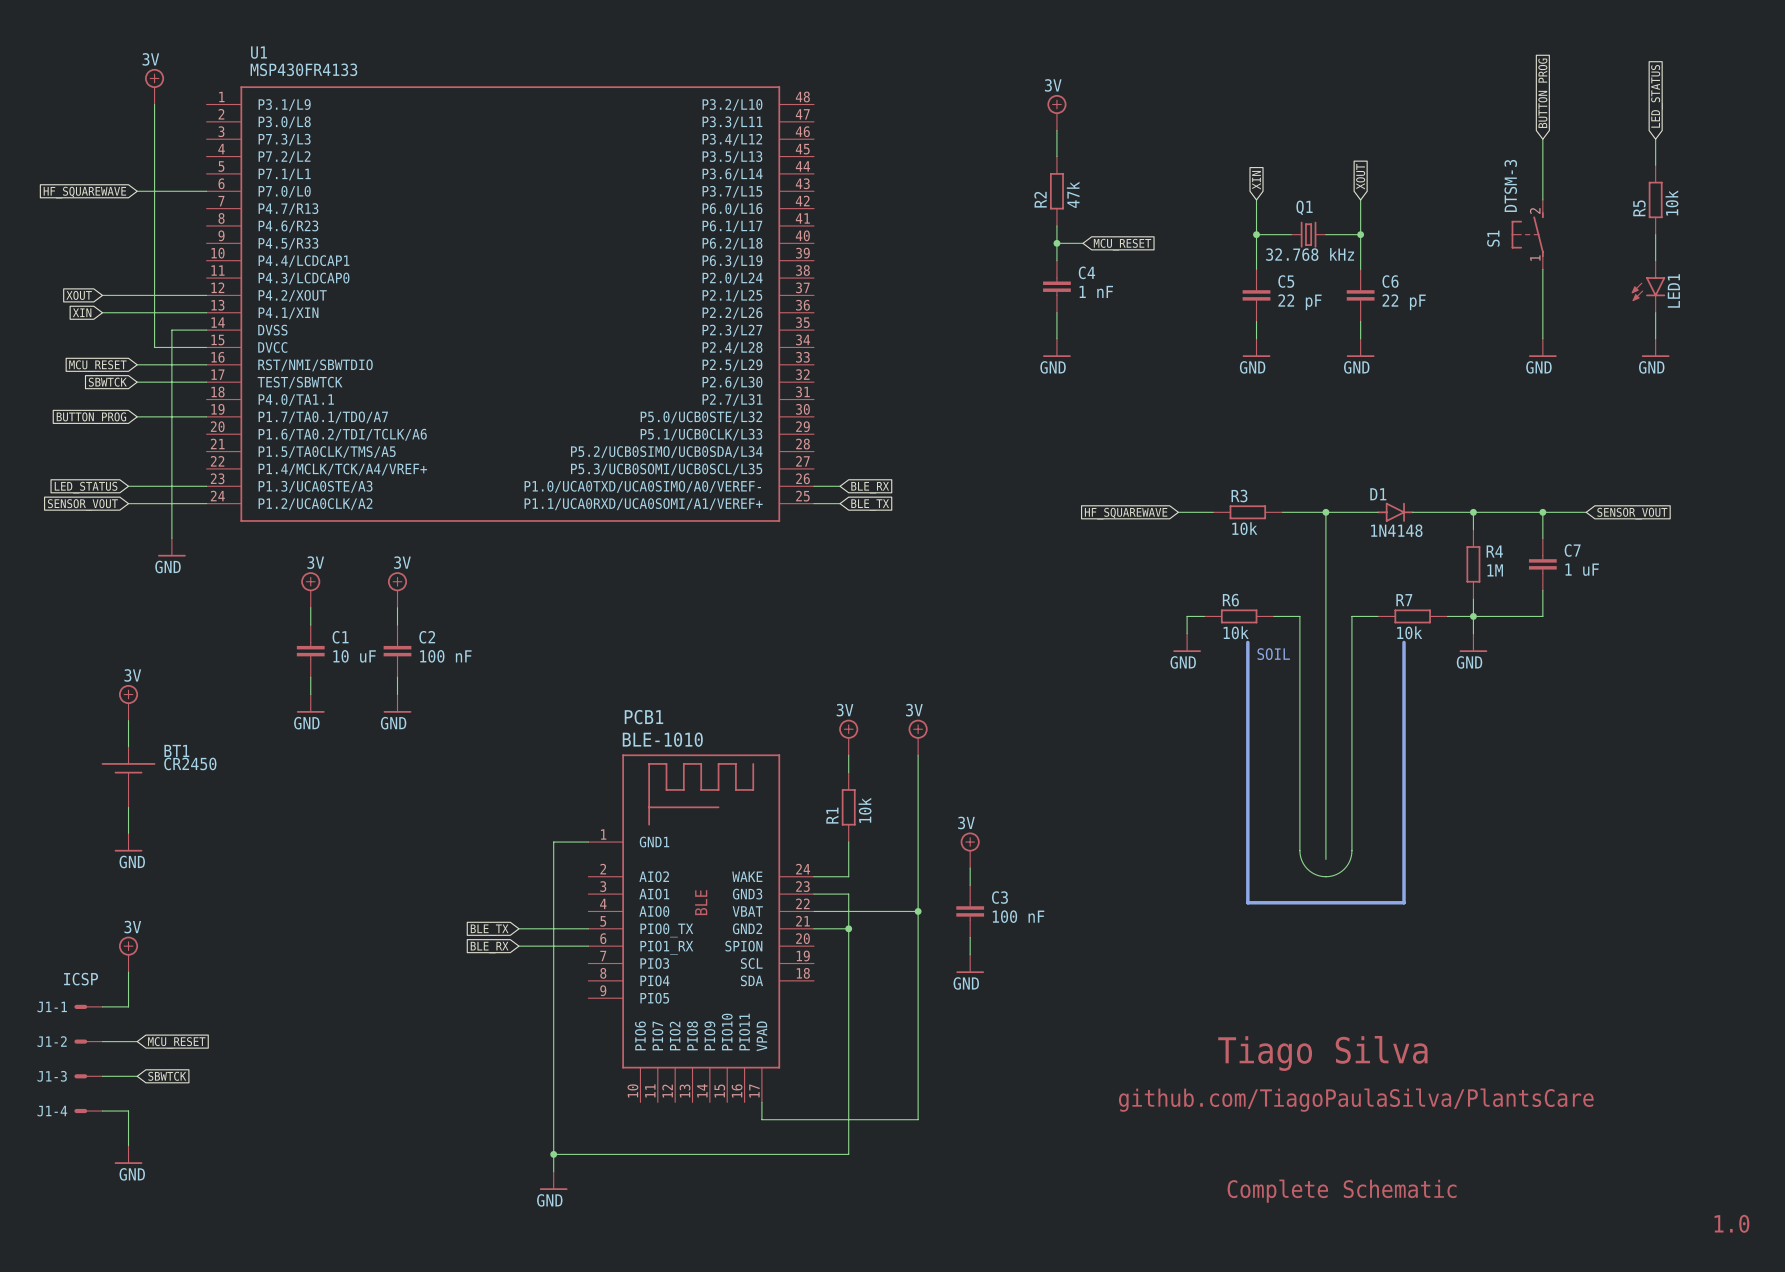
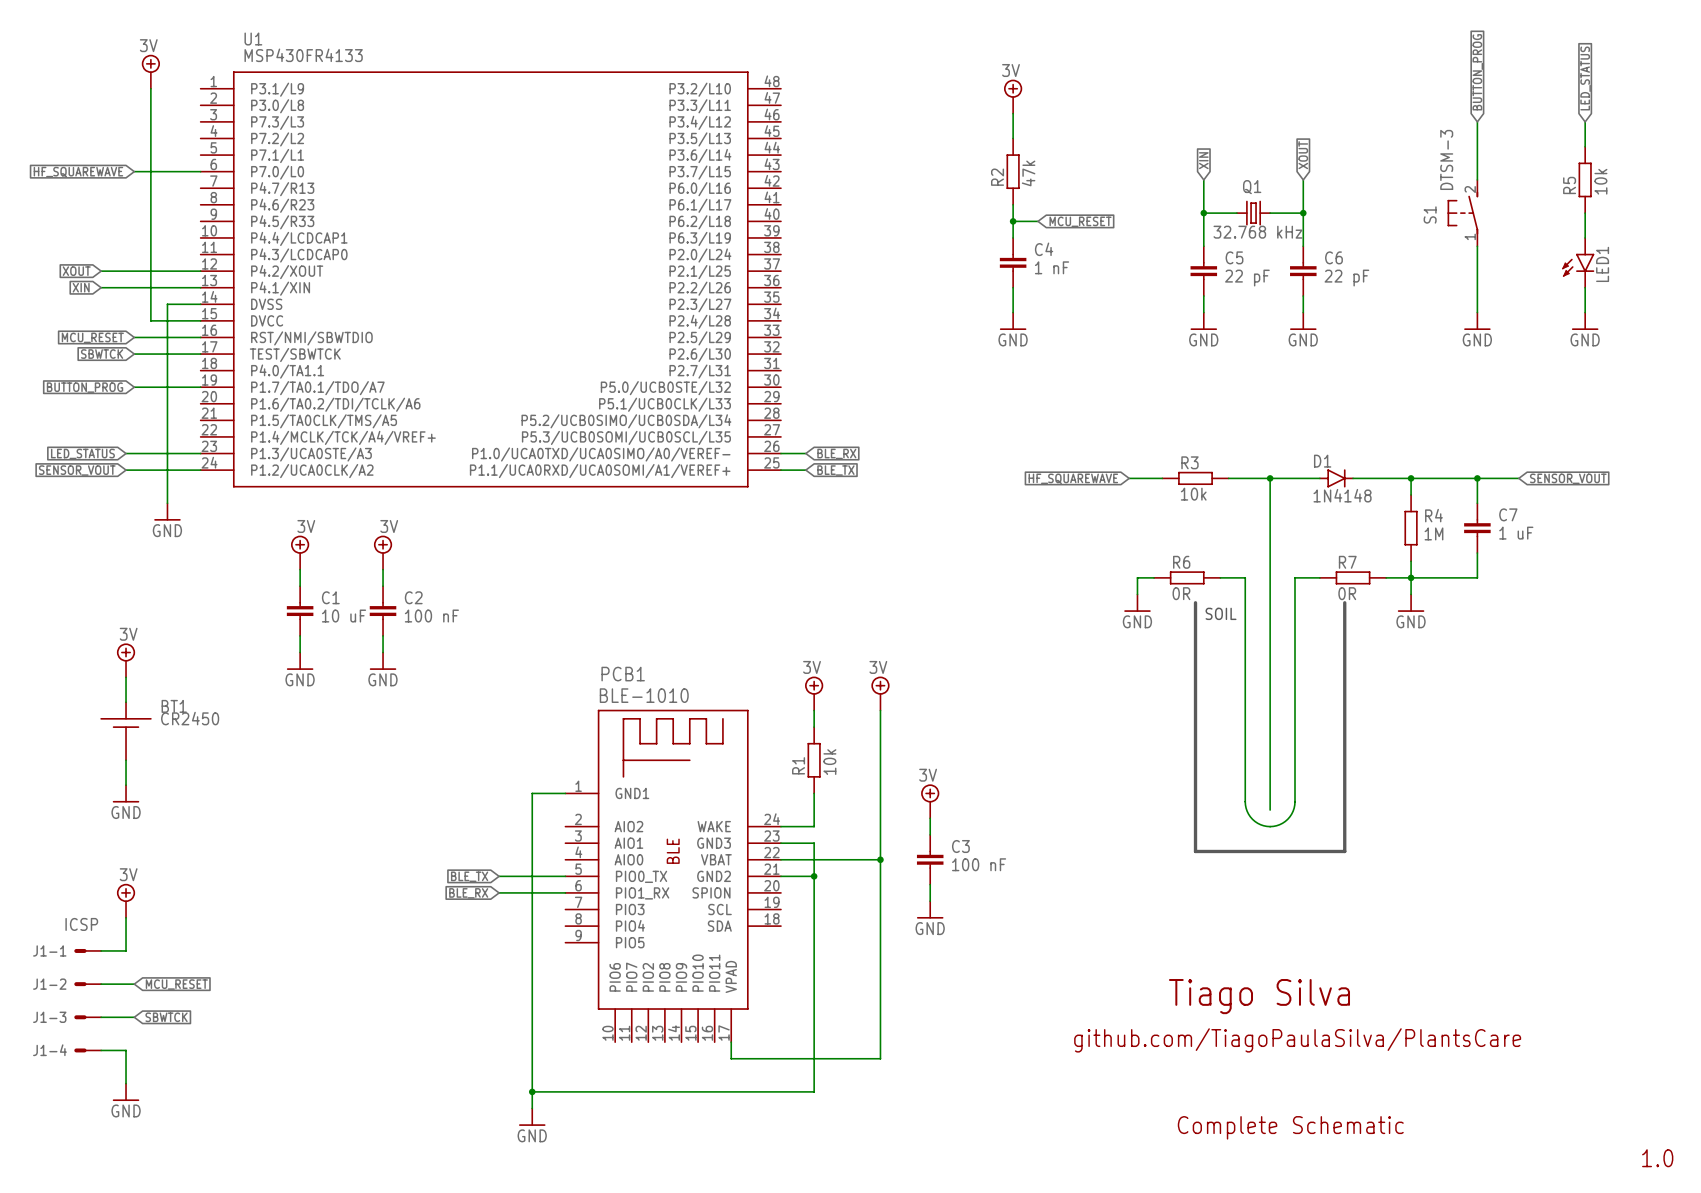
R6 value: 10k (1236, 632) -> 0R (1181, 593)
R7 value: 10k (1409, 632) -> 0R (1347, 593)

